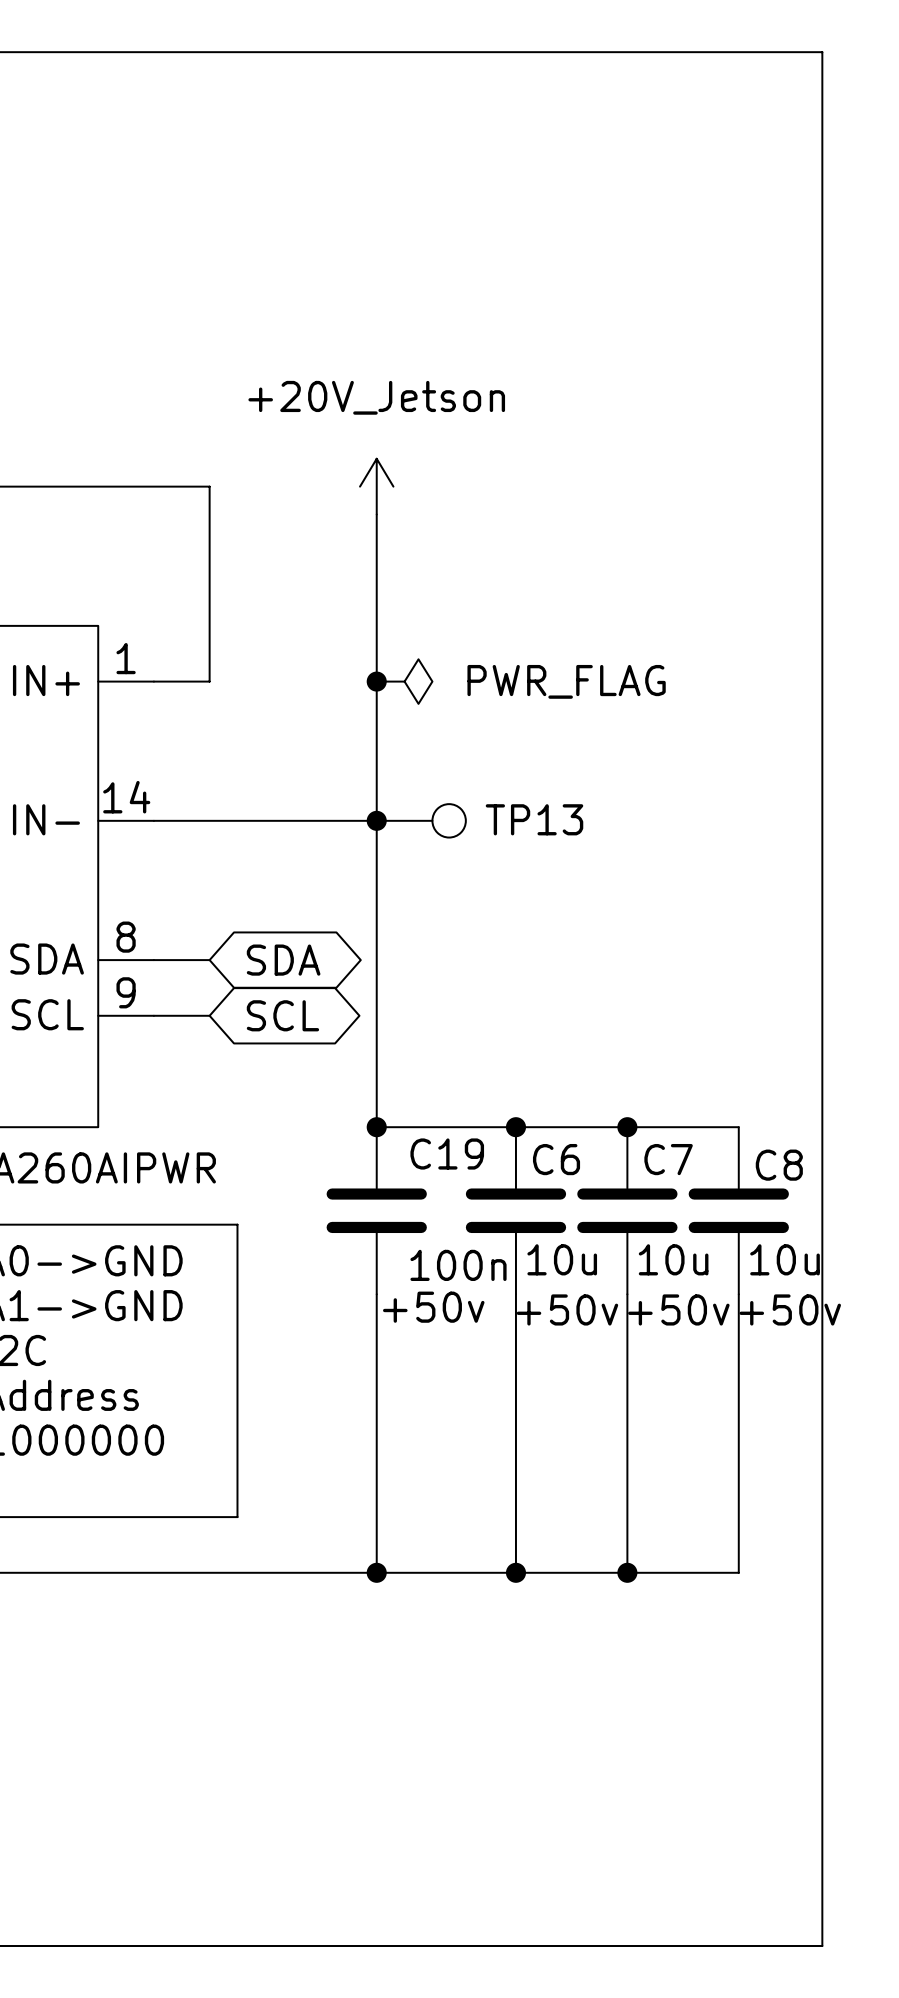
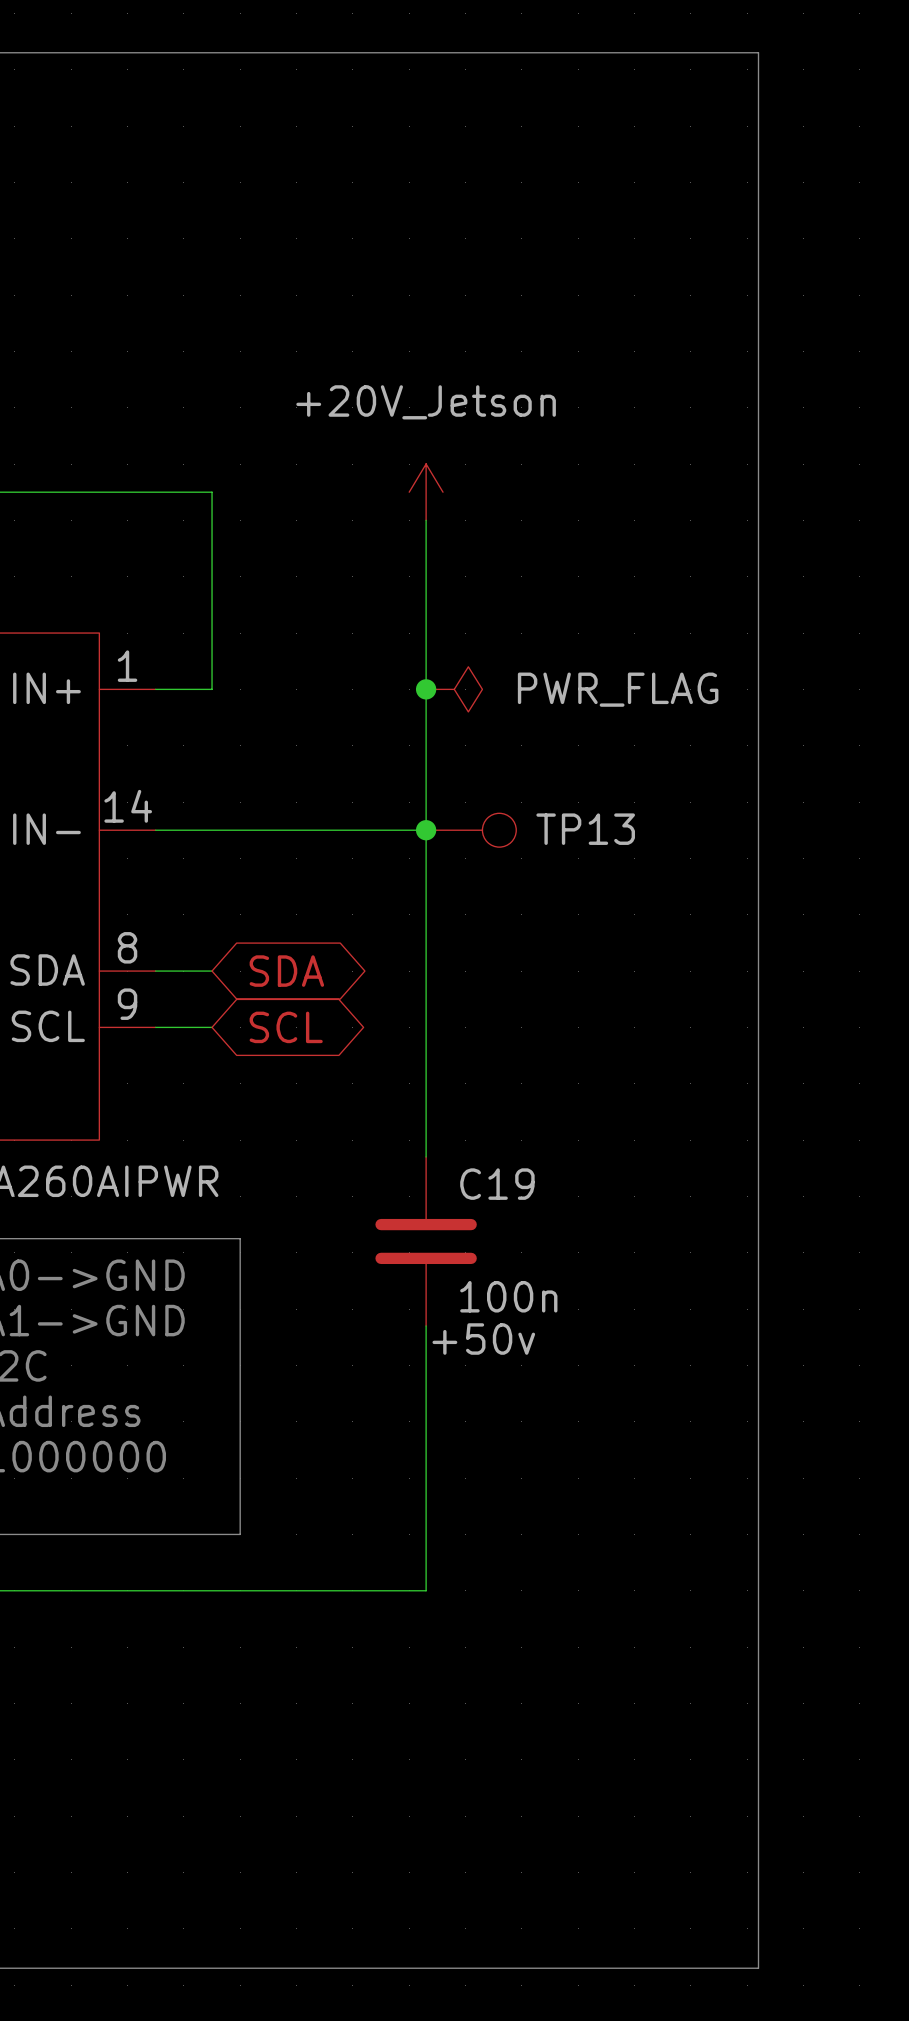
line: (749, 52) (822, 52) (822, 1946) (749, 1946) -> (758, 52) (758, 1968)
power symbol position: +20V_Jetson (376, 486) -> +20V_Jetson (426, 492)
wire: (376, 514) (376, 1127) (738, 1127) -> none
wire: none -> (426, 520) (426, 1156)
junction position: (376, 681) -> (426, 689)
power symbol position: PWR_FLAG (404, 681) -> PWR_FLAG (454, 689)
junction position: (376, 820) -> (426, 830)
TP13 position: (421, 820) -> (471, 830)
junction: (376, 1127) -> none
junction: (515, 1127) -> none
junction: (627, 1127) -> none
C19 position: (376, 1210) -> (426, 1241)
C6: 10u (515, 1210) -> none
C7: 10u (627, 1210) -> none
C8: 10u (738, 1210) -> none
wire: (376, 1294) (376, 1572) -> none
wire: (515, 1294) (515, 1572) -> none
wire: (627, 1294) (627, 1572) -> none
wire: (738, 1294) (738, 1572) (421, 1572) -> (426, 1325) (426, 1590)
junction: (376, 1572) -> none
junction: (515, 1572) -> none
junction: (627, 1572) -> none

